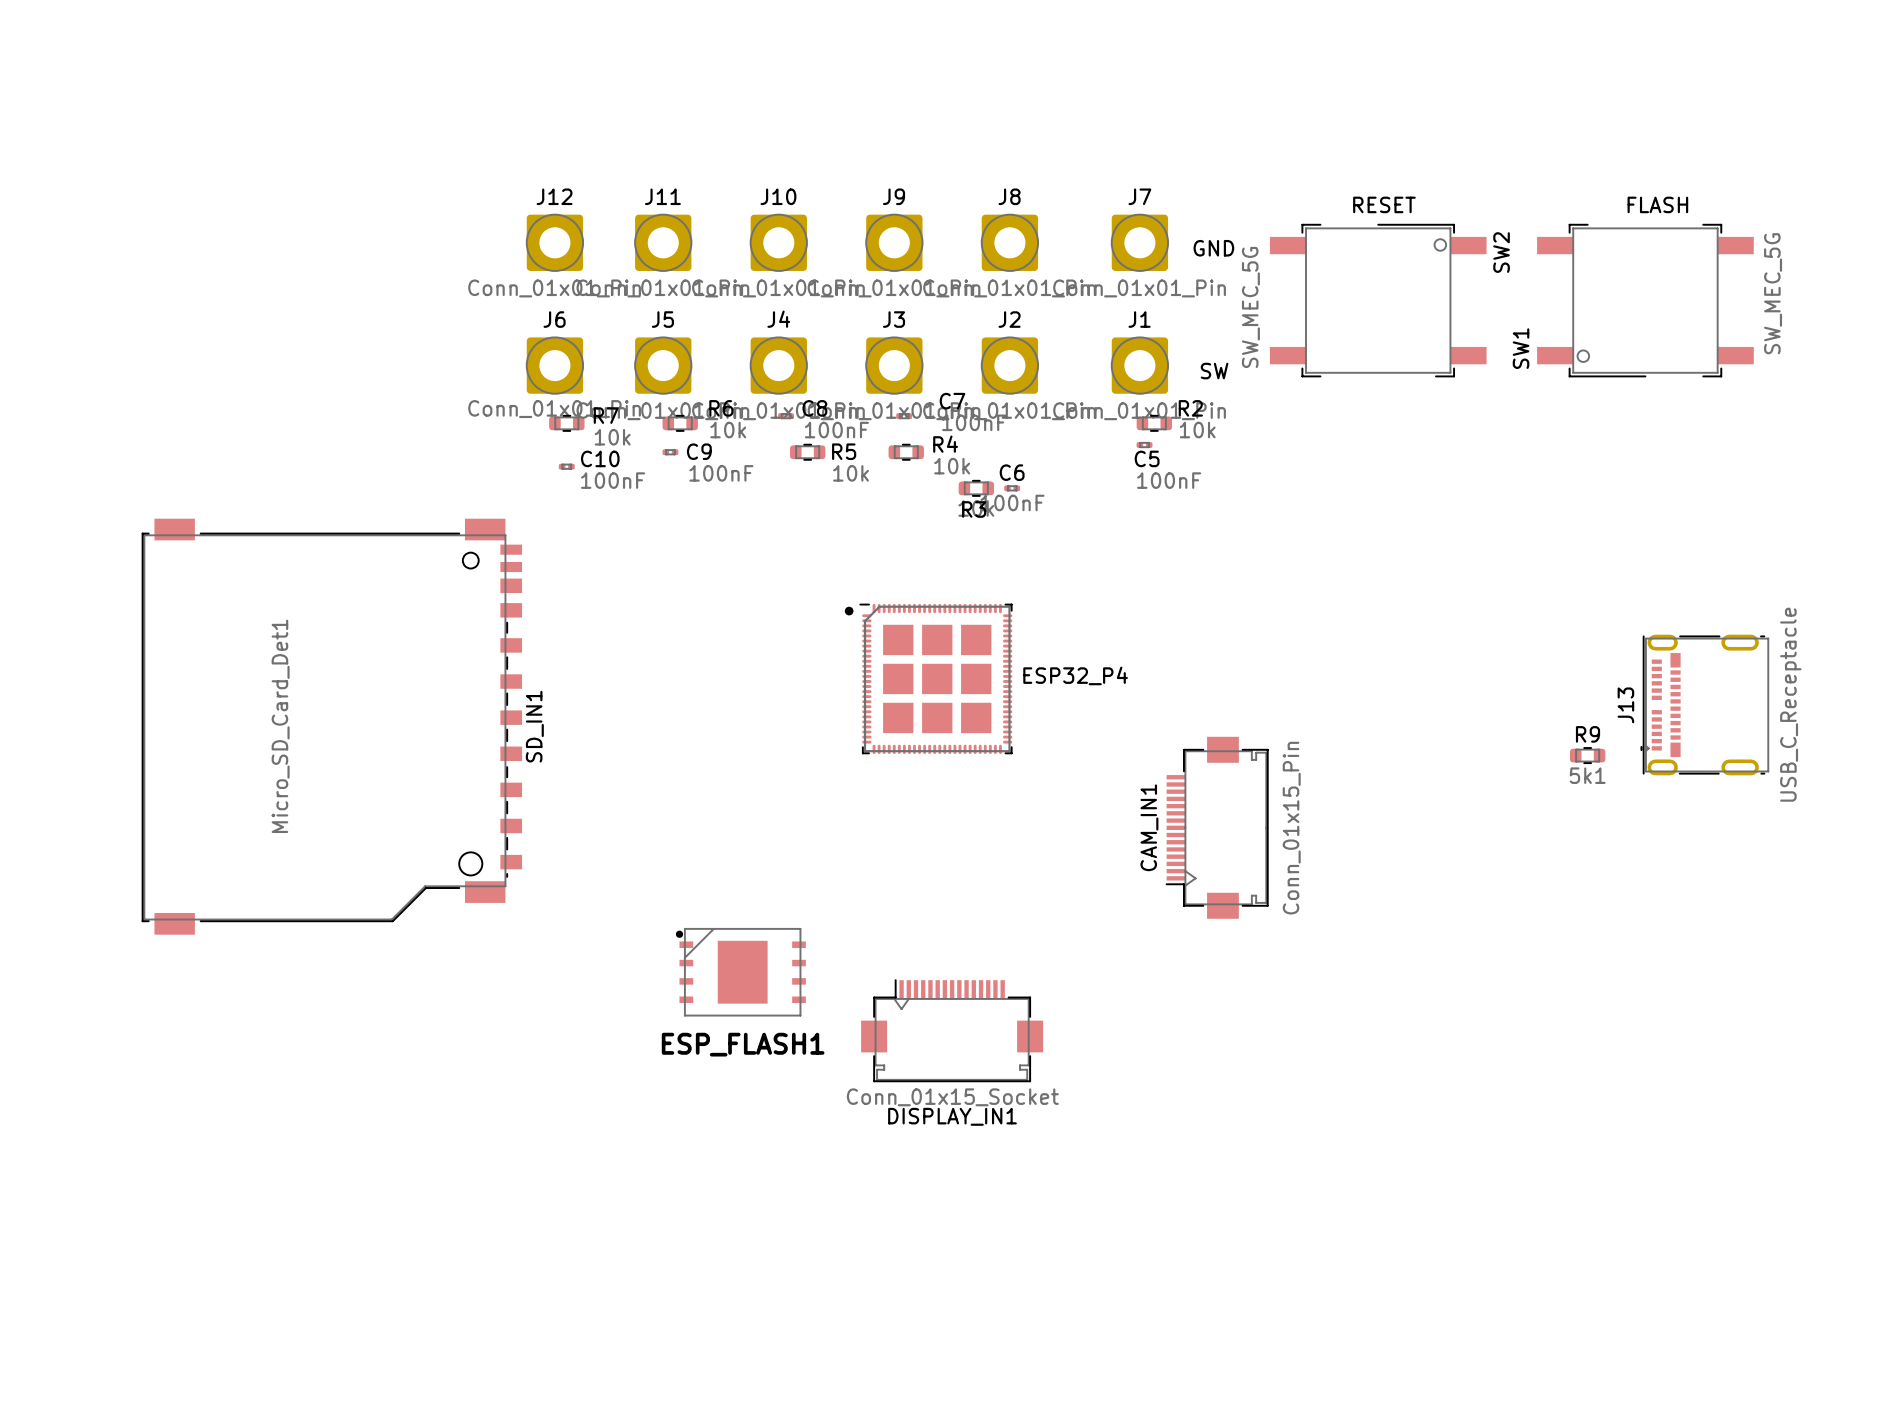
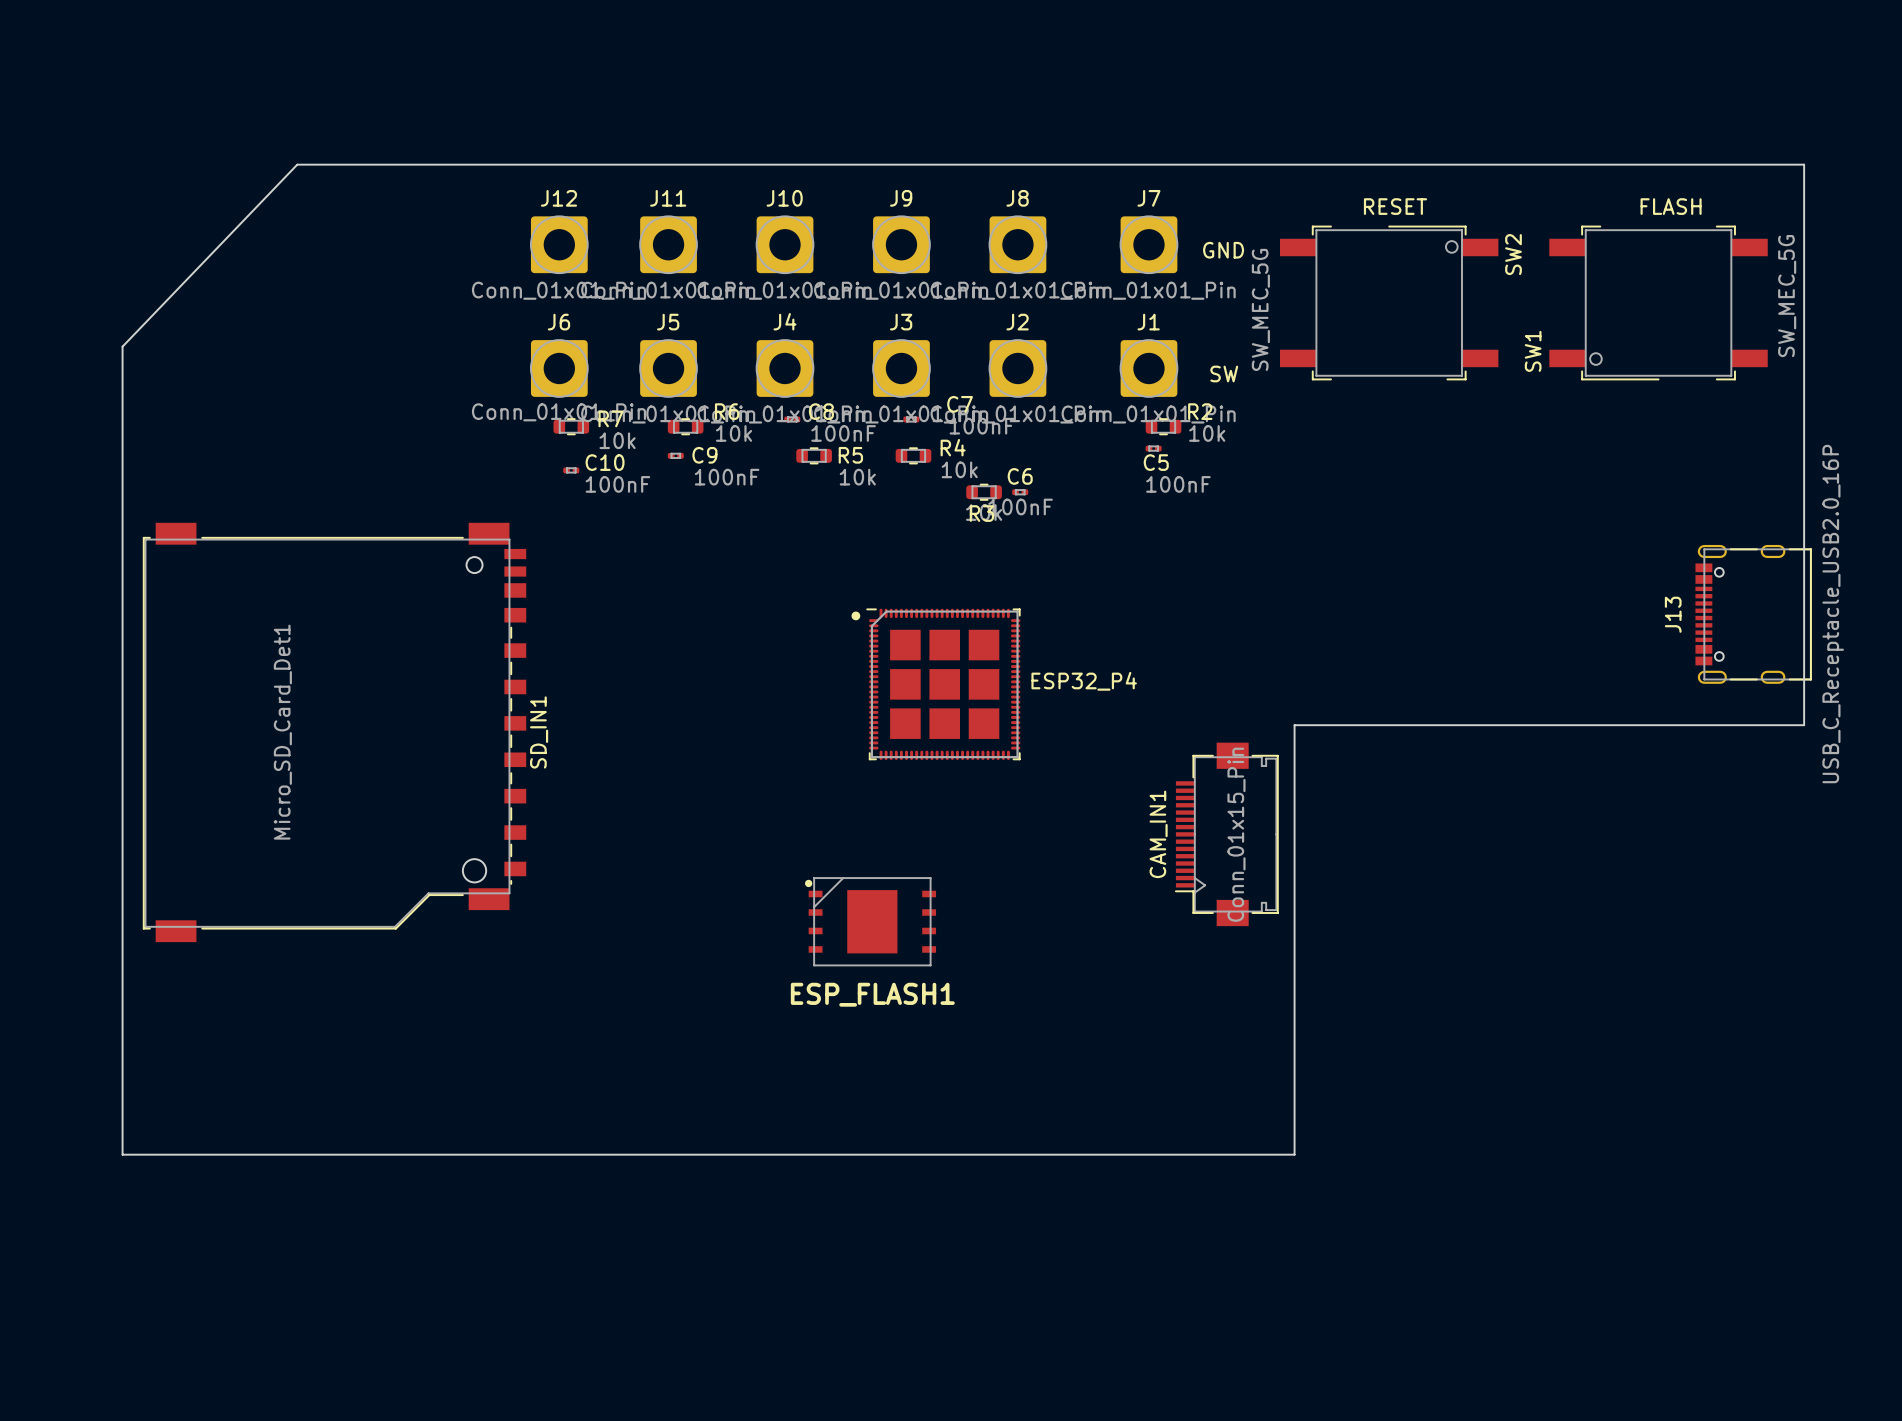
board edge: none -> (297, 164) (122, 346) (122, 1154) (1294, 1154) (1294, 725) (1804, 725) (1804, 164) (297, 164)
J13 footprint: [1640, 634, 1770, 776] -> [1695, 544, 1812, 684]
J13 value: USB_C_Receptacle (1790, 704) -> USB_C_Receptacle_USB2.0_16P (1833, 614)
R9: 5k1 (1587, 755) -> none
CAM_IN1 value position: Conn_01x15_Pin (1291, 828) -> Conn_01x15_Pin (1236, 834)
ESP_FLASH1 position: (740, 972) -> (870, 921)
DISPLAY_IN1: Conn_01x15_Socket (952, 1030) -> none

